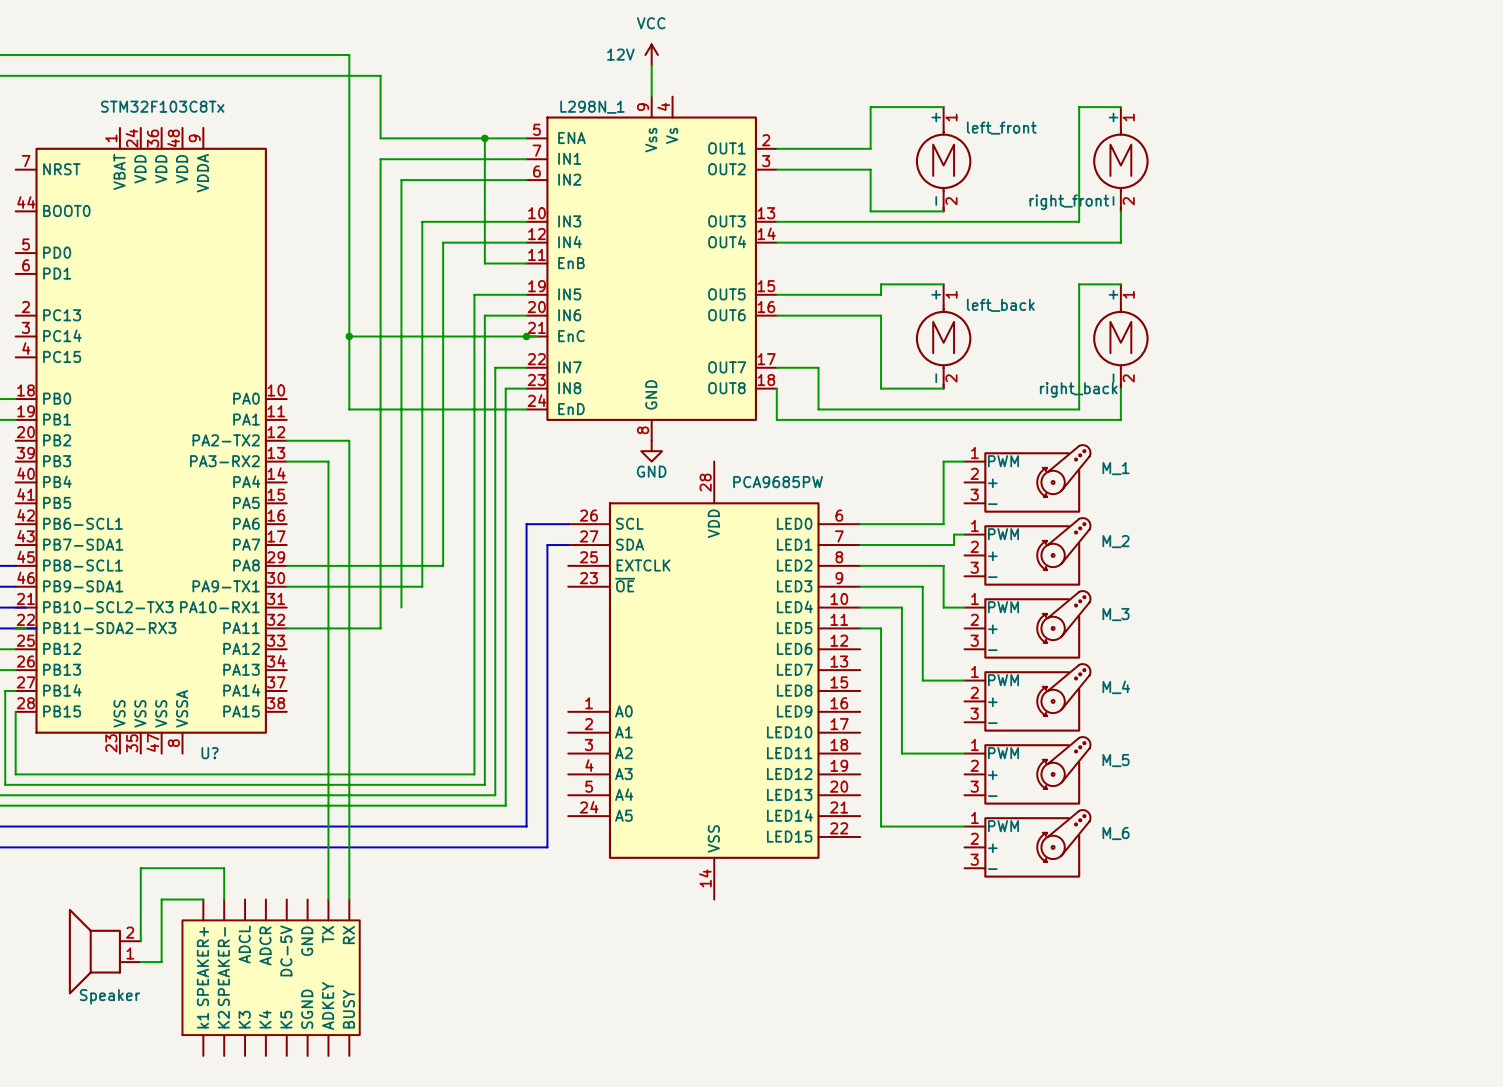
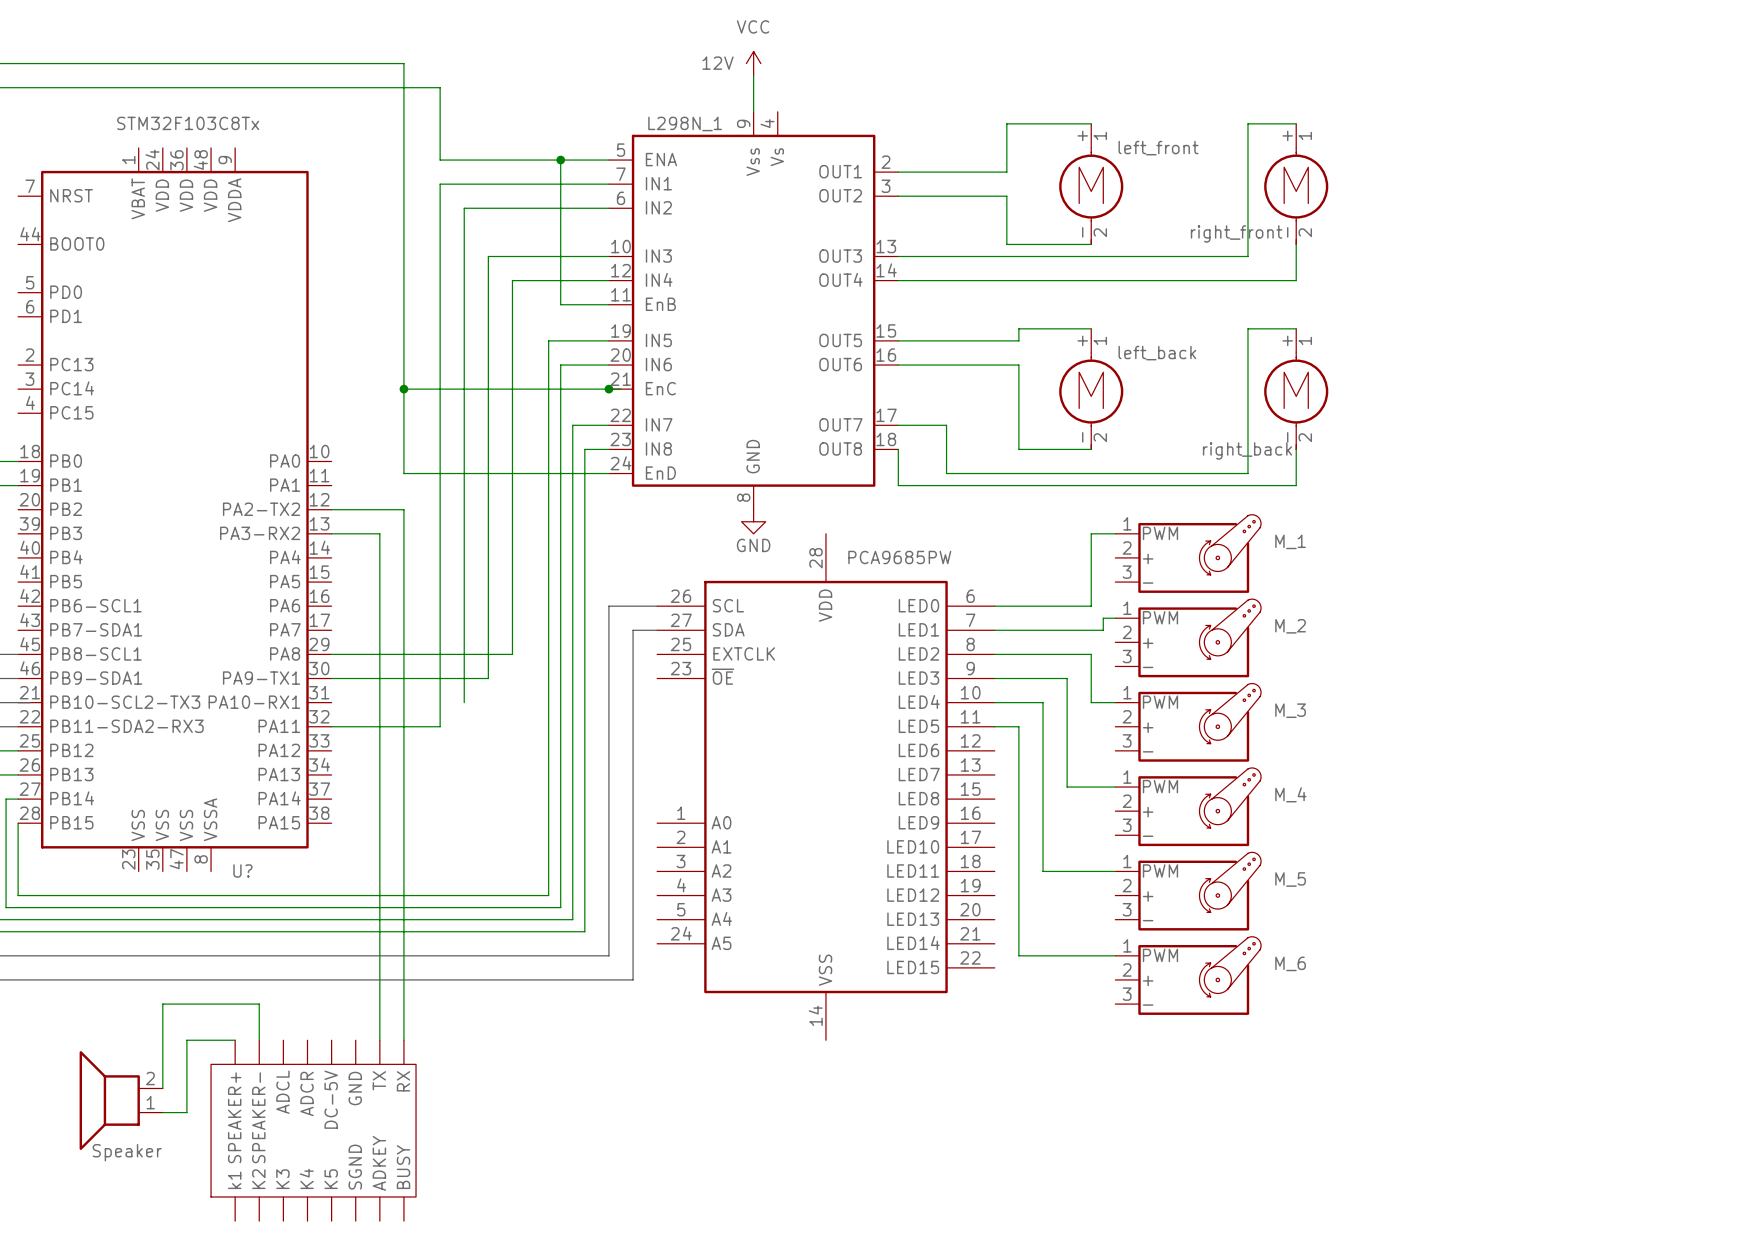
bus: (15, 628) (36, 628) -> none

